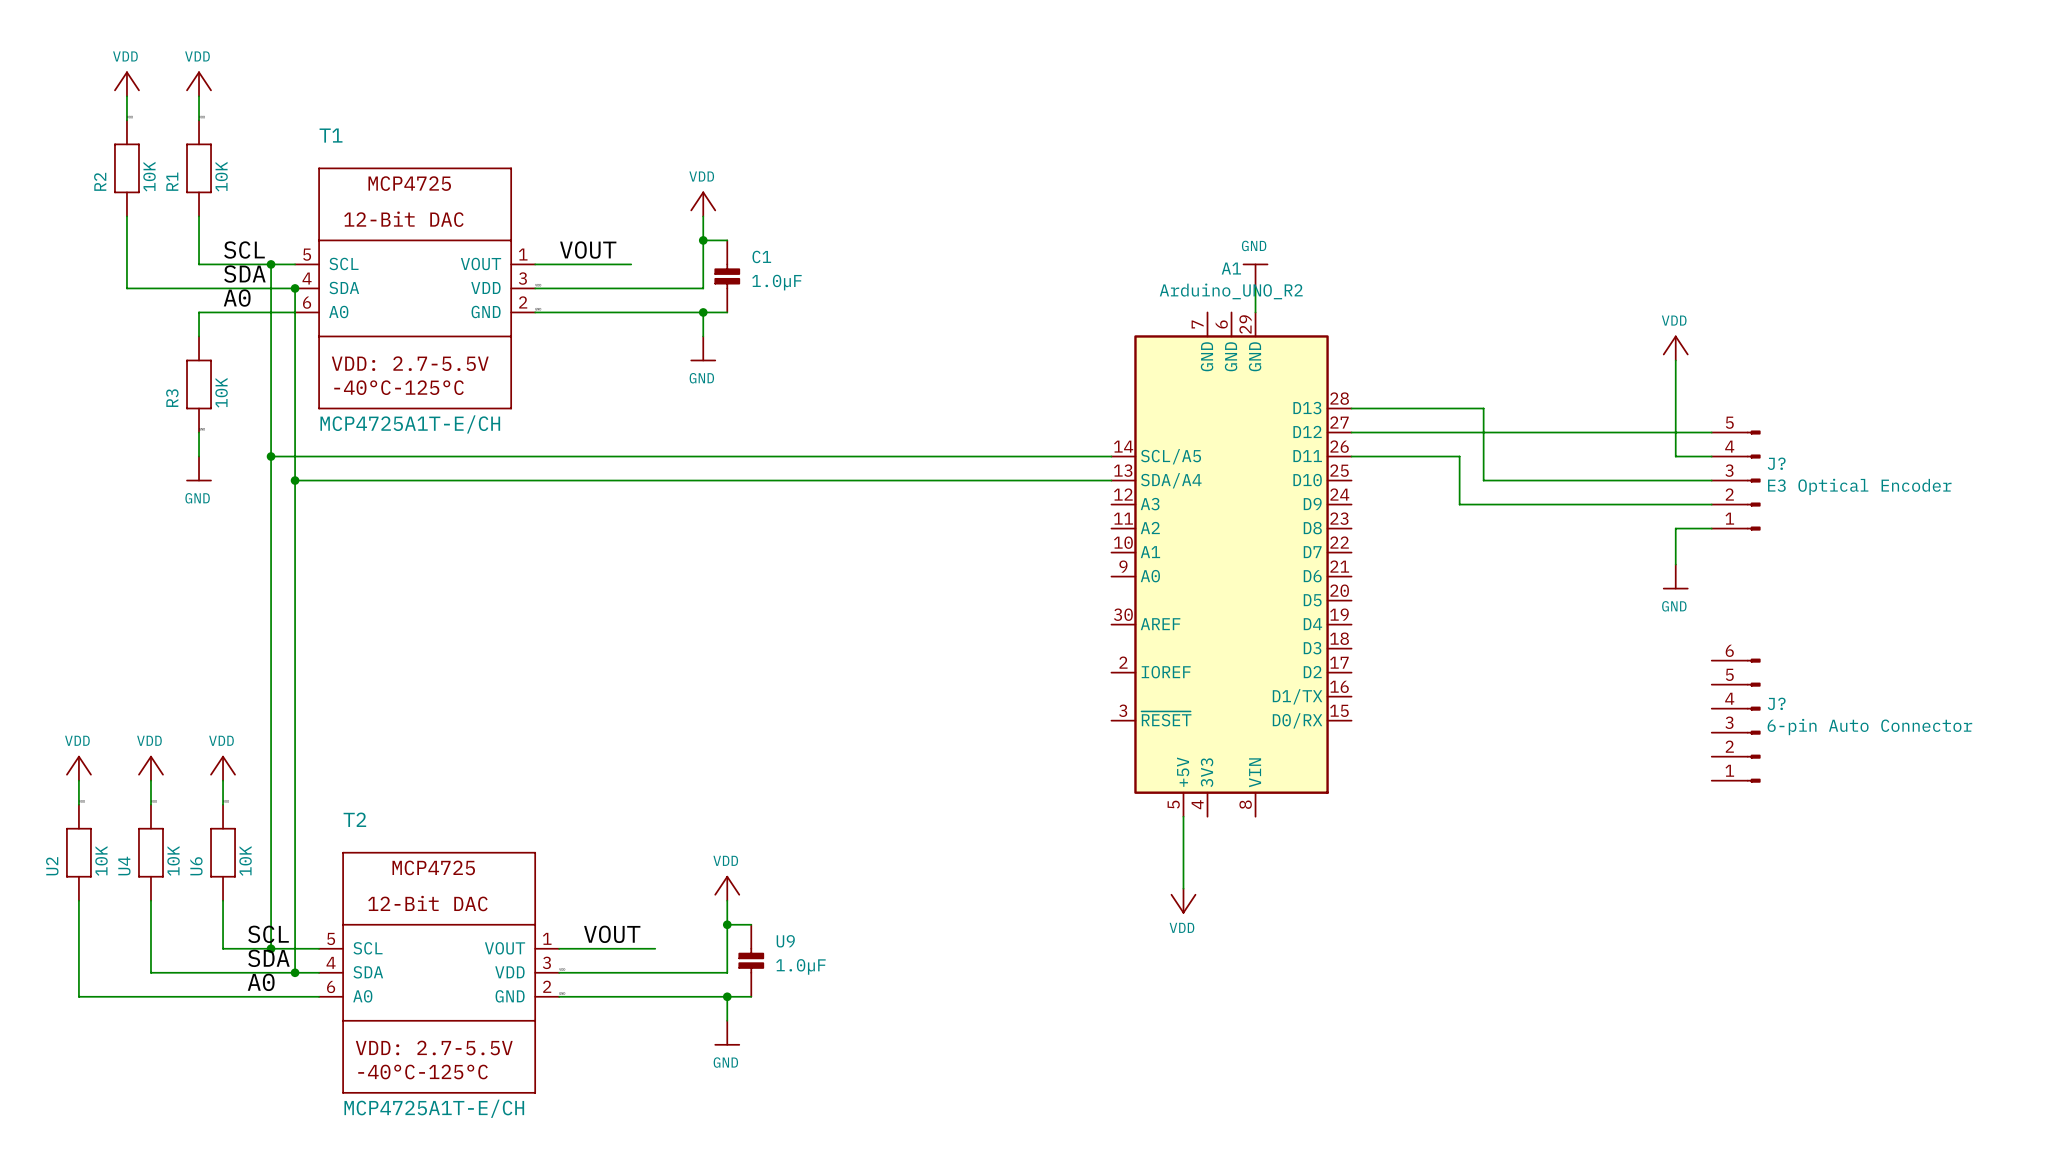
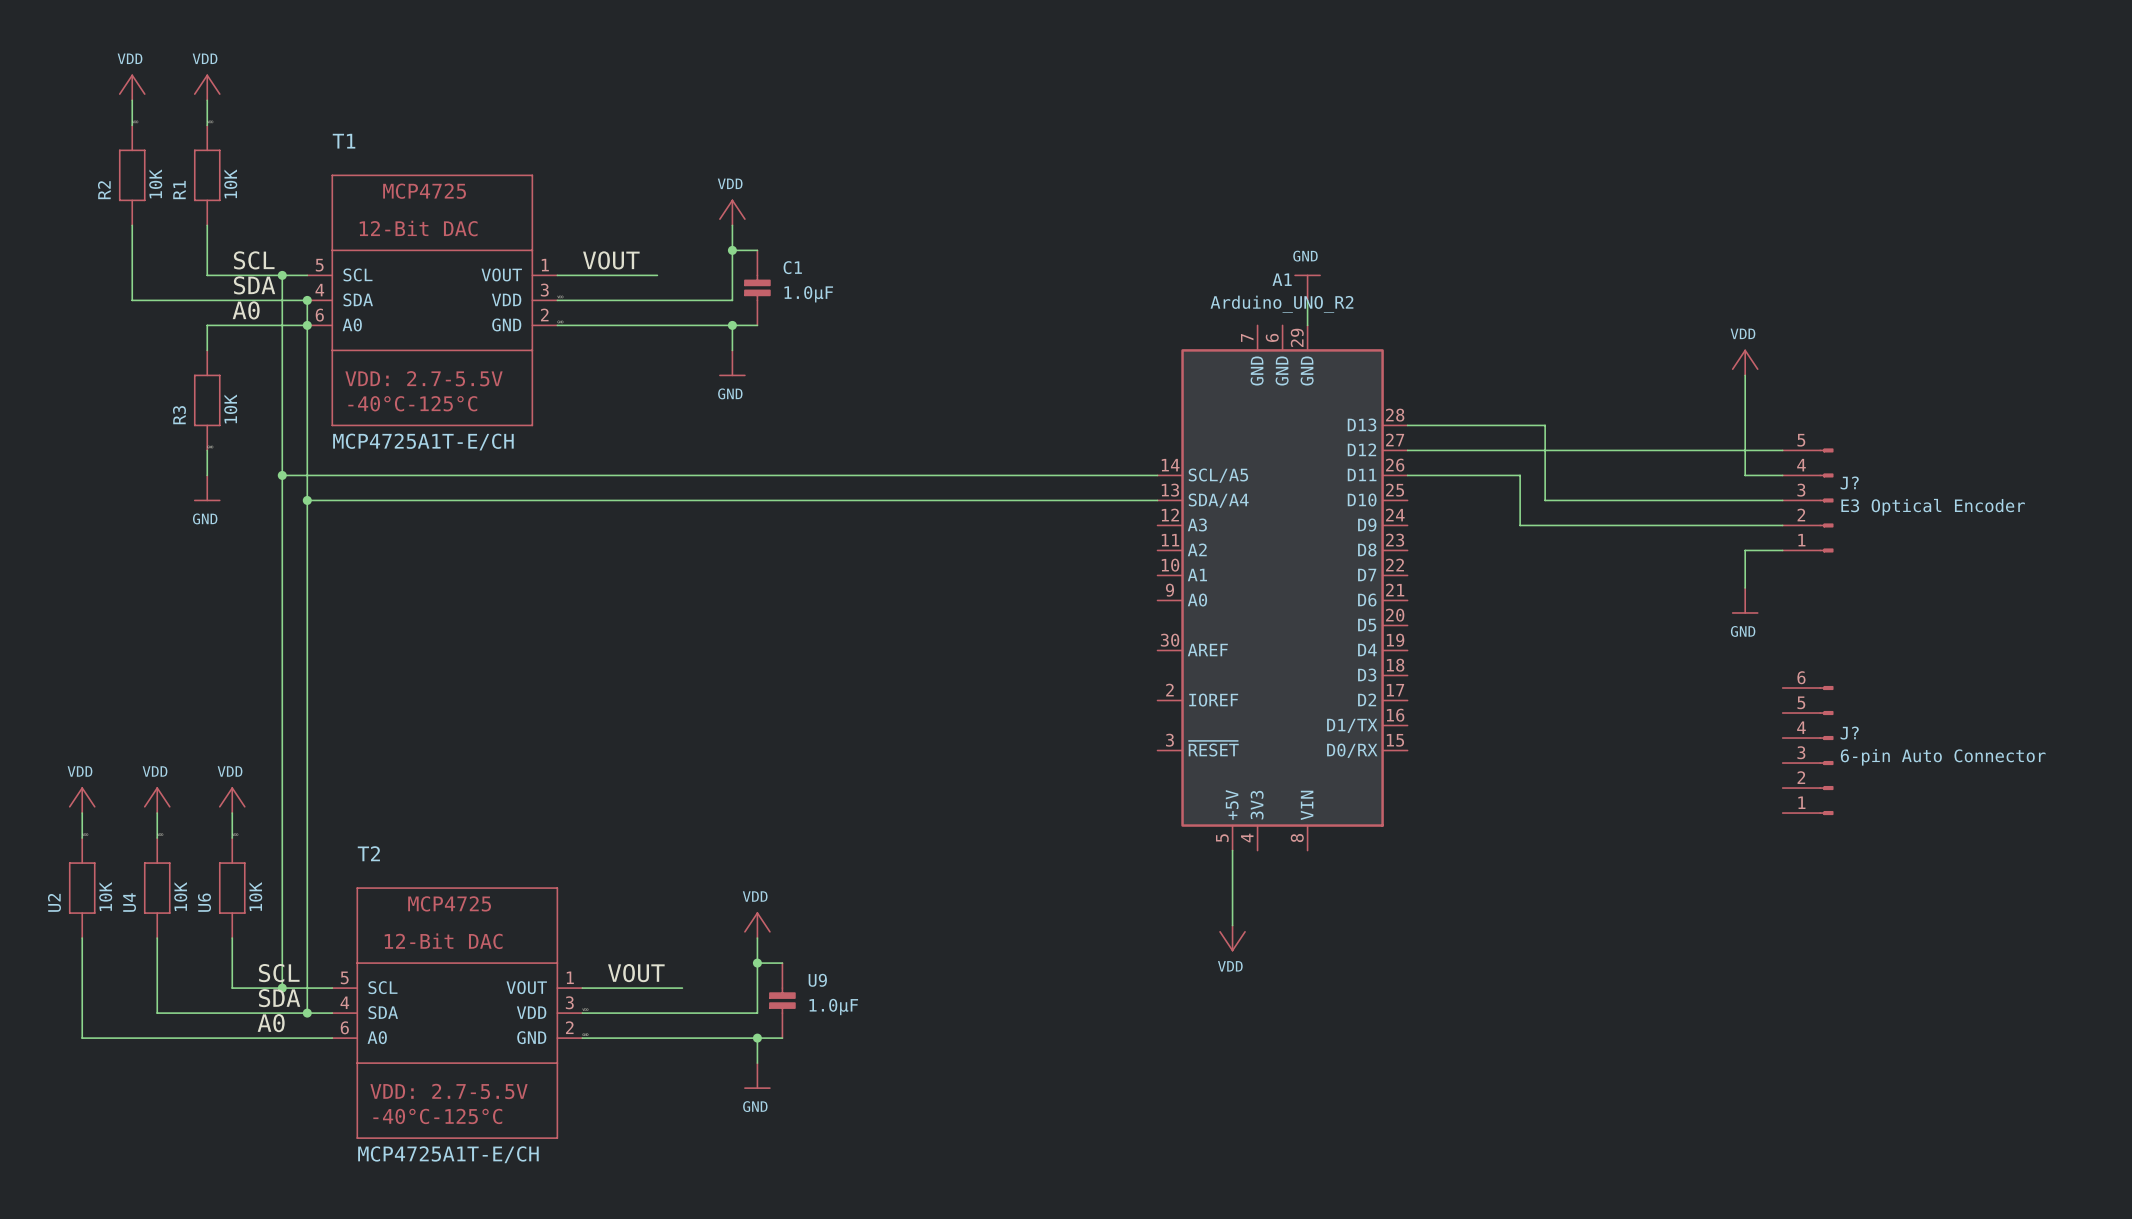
junction: none -> (307, 325)

